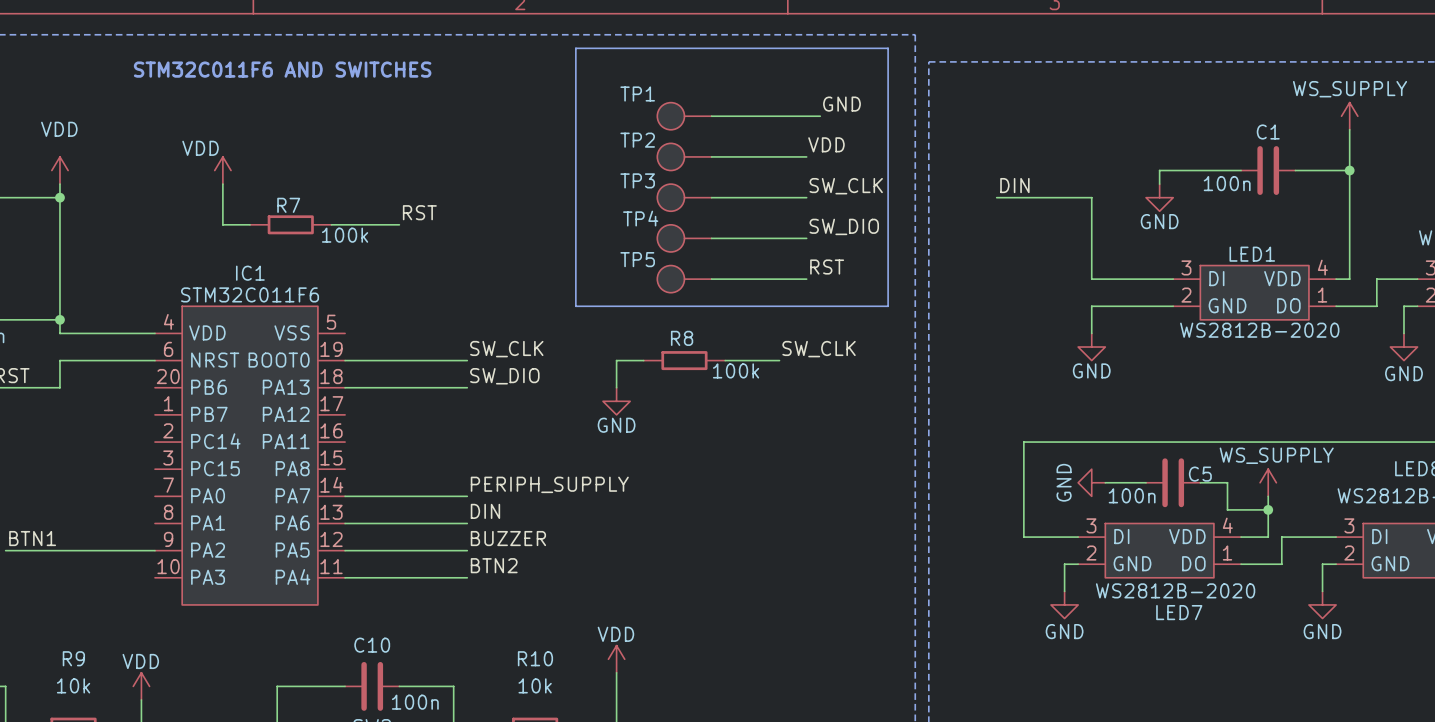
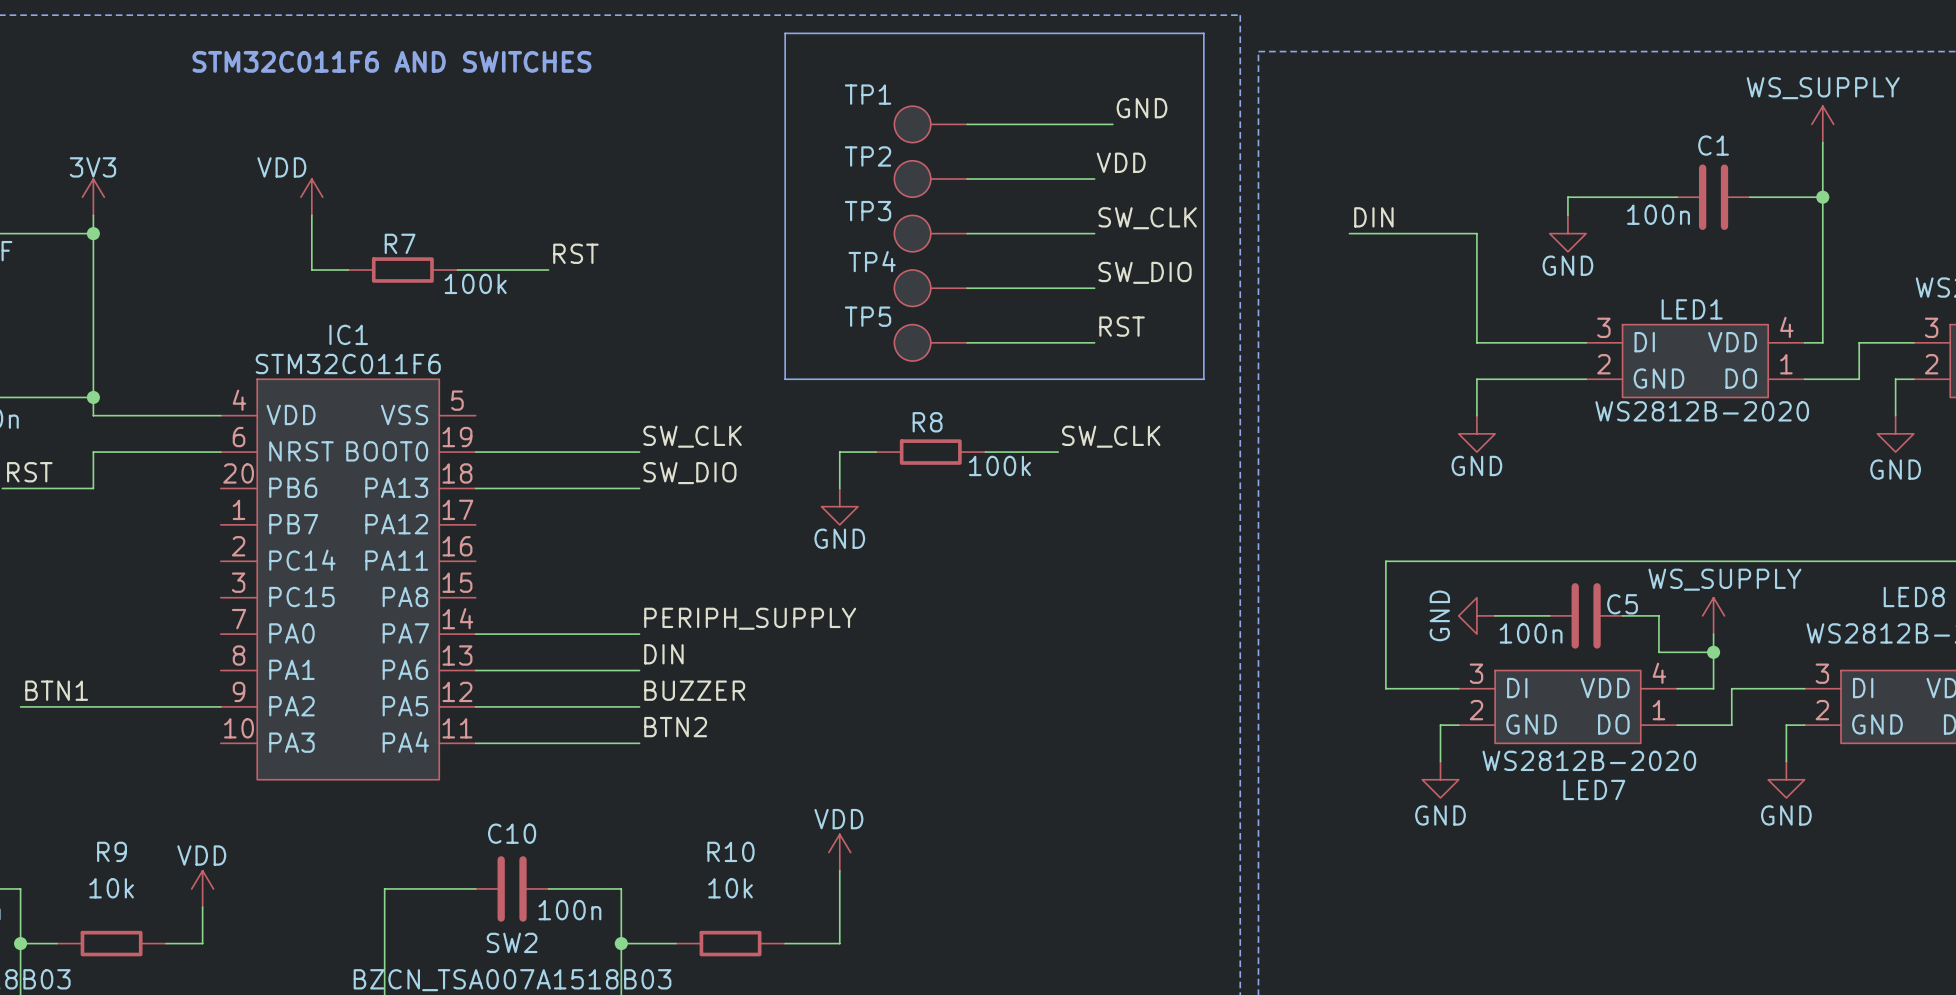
power symbol: VDD (59, 170) -> 3V3 (93, 197)

